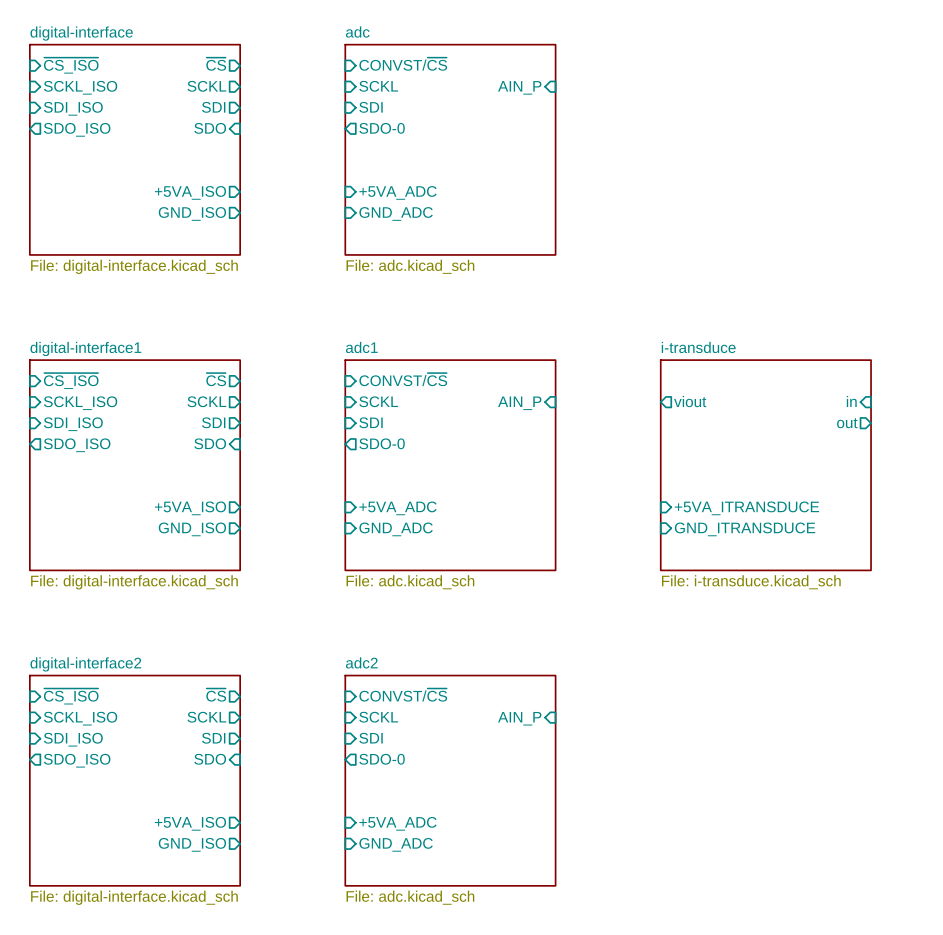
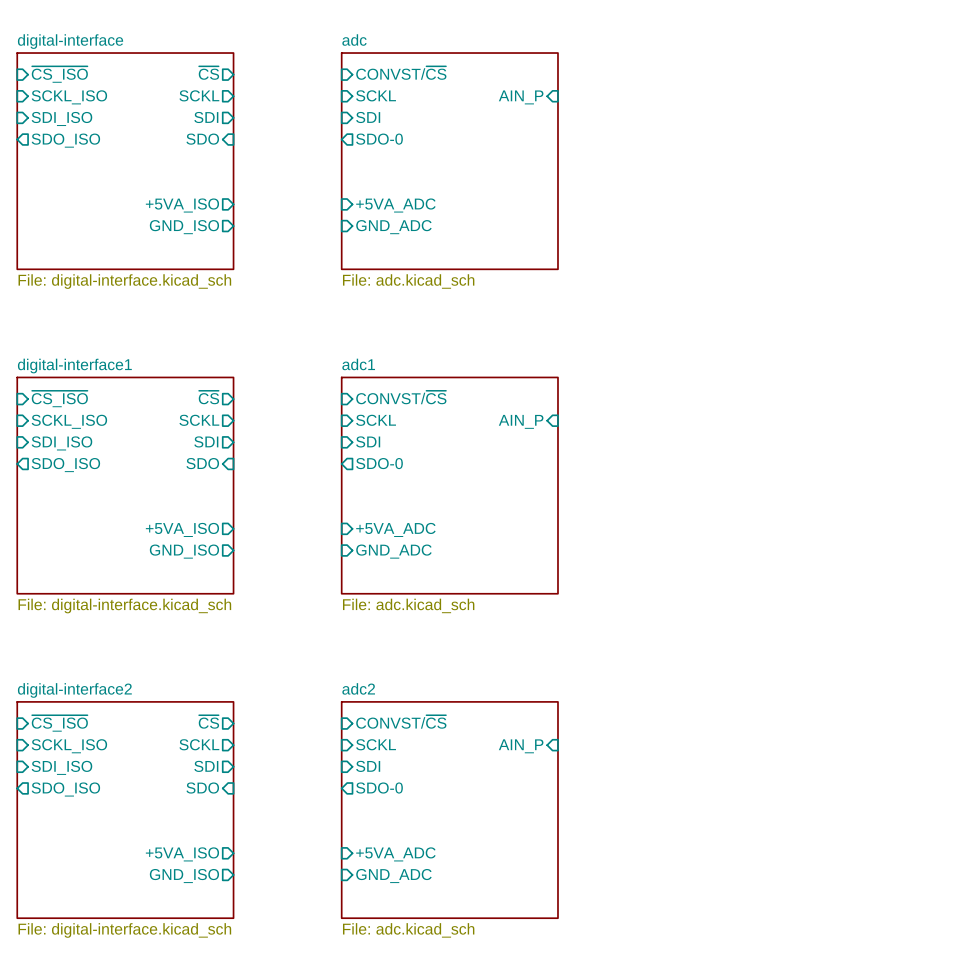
sheet pin: viout (690, 401) -> none
sheet pin: in (851, 401) -> none
sheet pin: out (847, 423) -> none
sheet i-transduce: File: i-transduce.kicad_sch (765, 465) -> none
sheet pin: +5VA_ITRANSDUCE (746, 508) -> none
sheet pin: GND_ITRANSDUCE (745, 529) -> none

